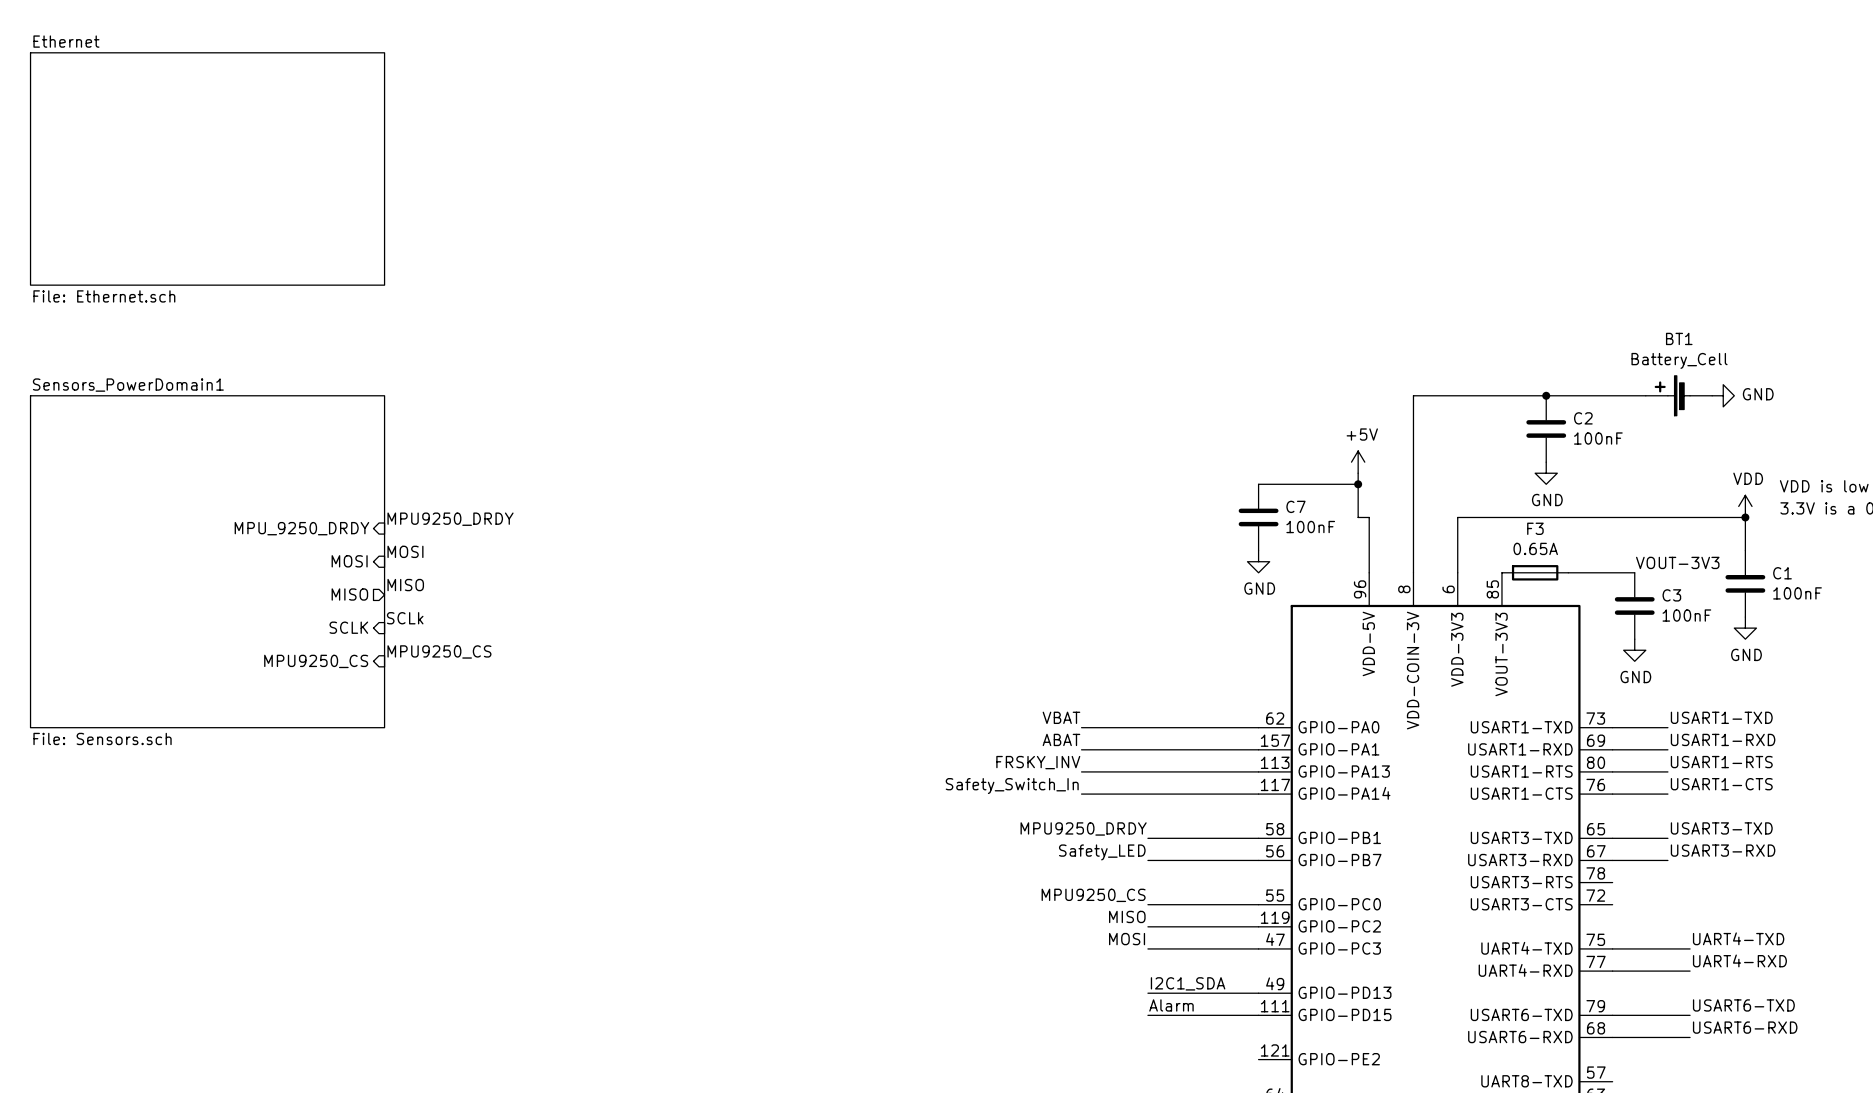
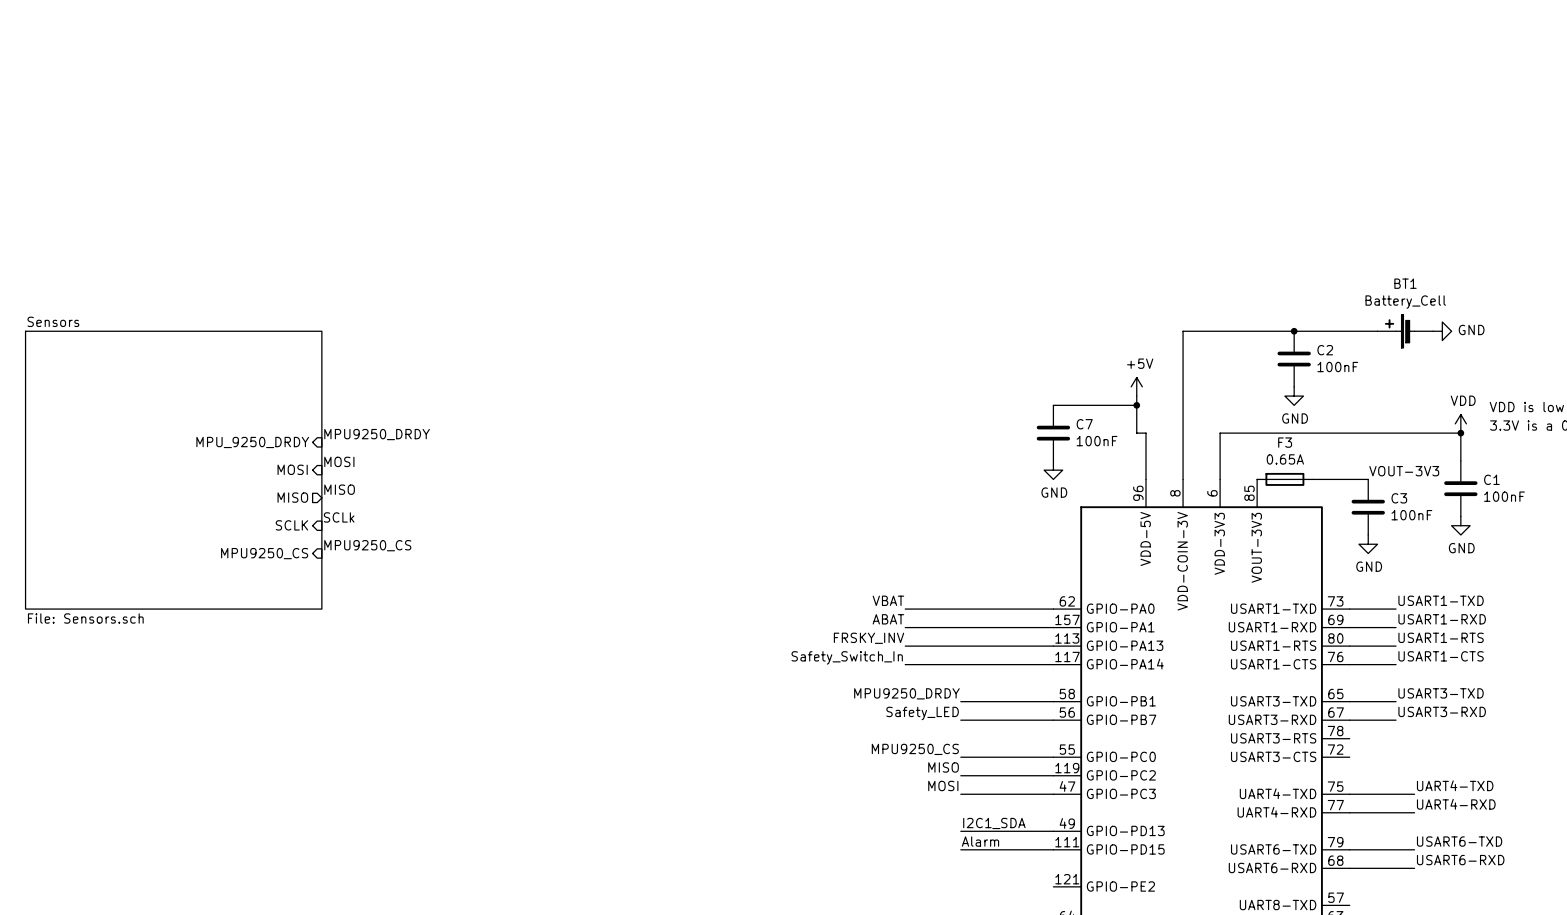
sheet Ethernet: File: Ethernet.sch (207, 168) -> none
sheet Sensors_PowerDomain1 name: Sensors_PowerDomain1 (128, 385) -> Sensors (53, 321)

